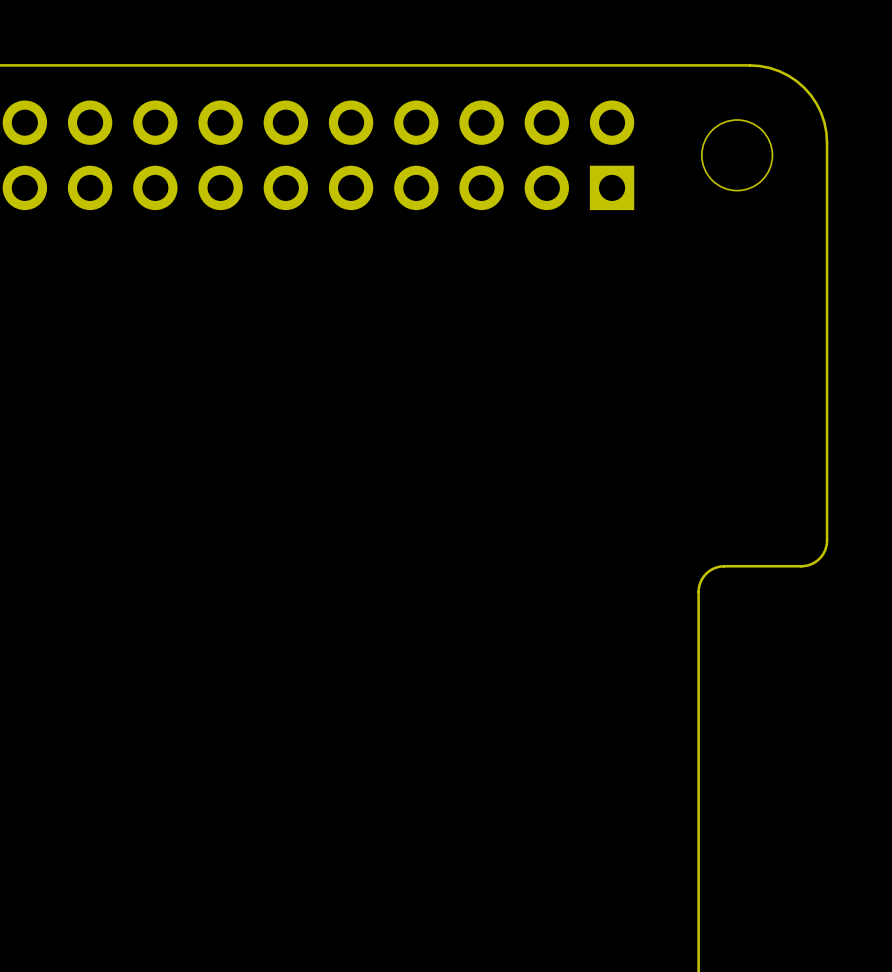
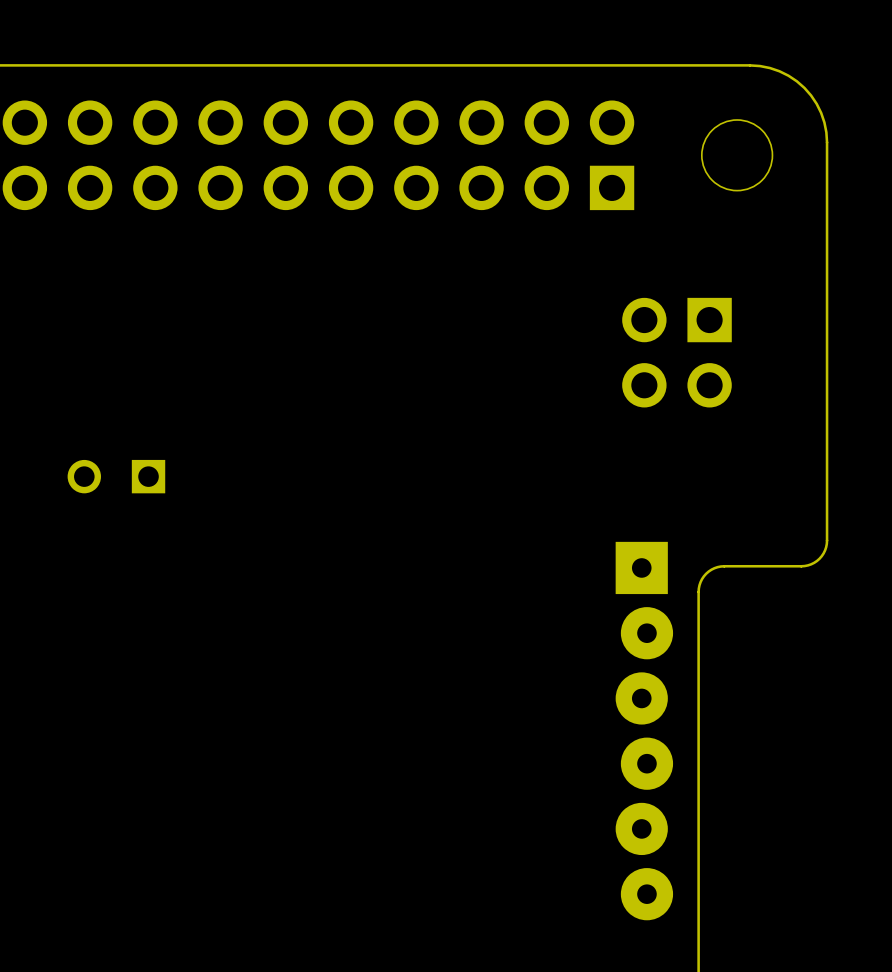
part: none -> (676, 352)
part: none -> (116, 476)
part: none -> (644, 731)

